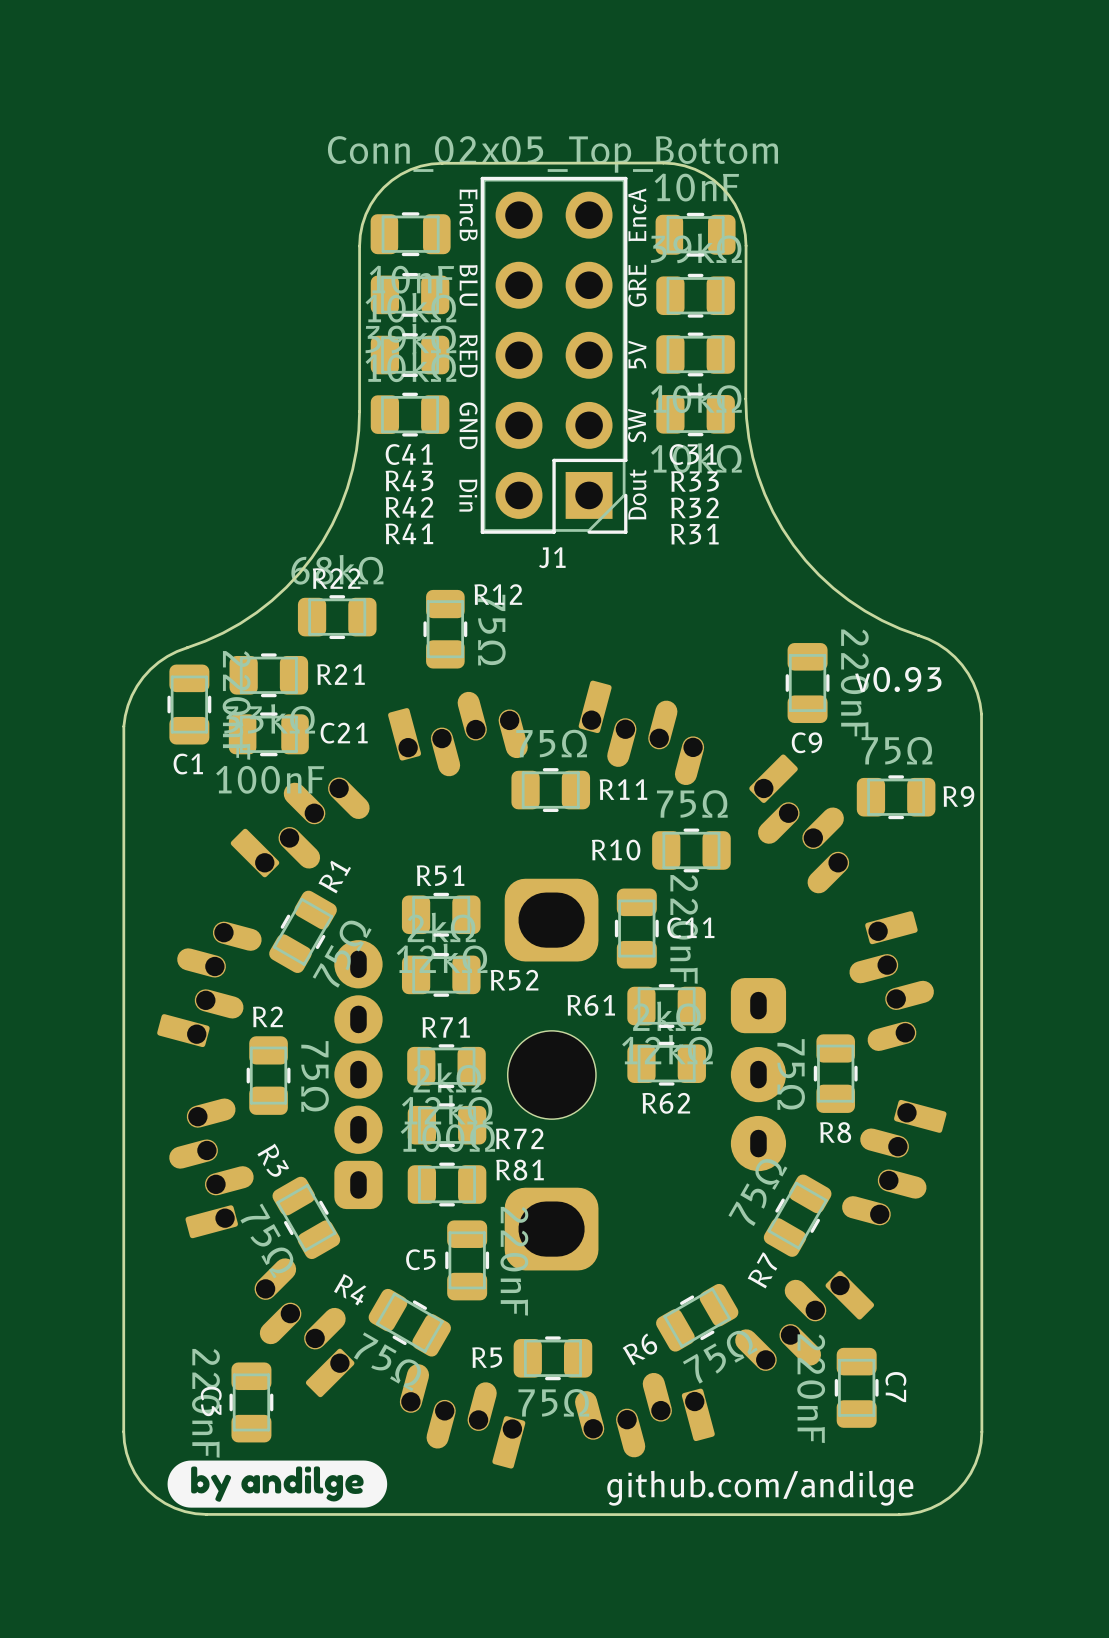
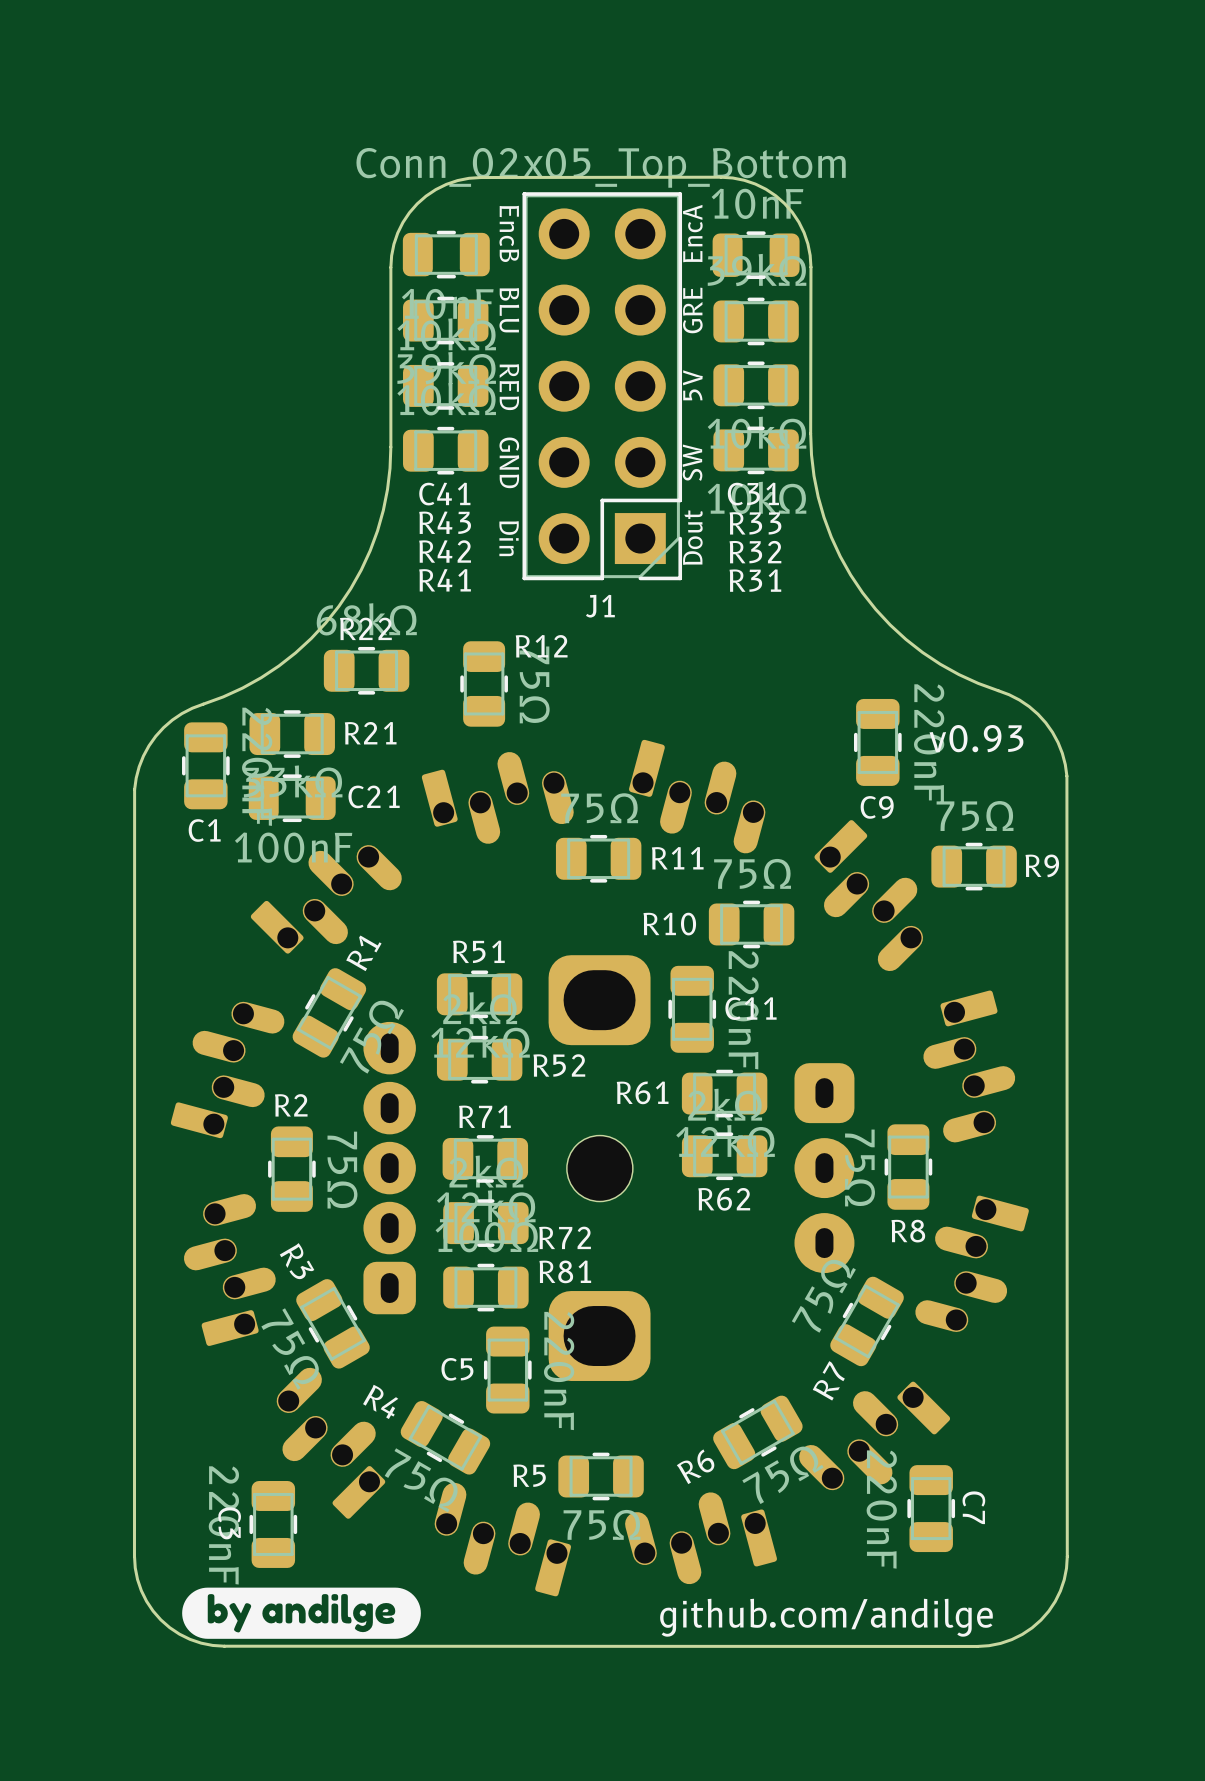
part footprint: [507, 1030, 596, 1120] -> [566, 1135, 633, 1202]

